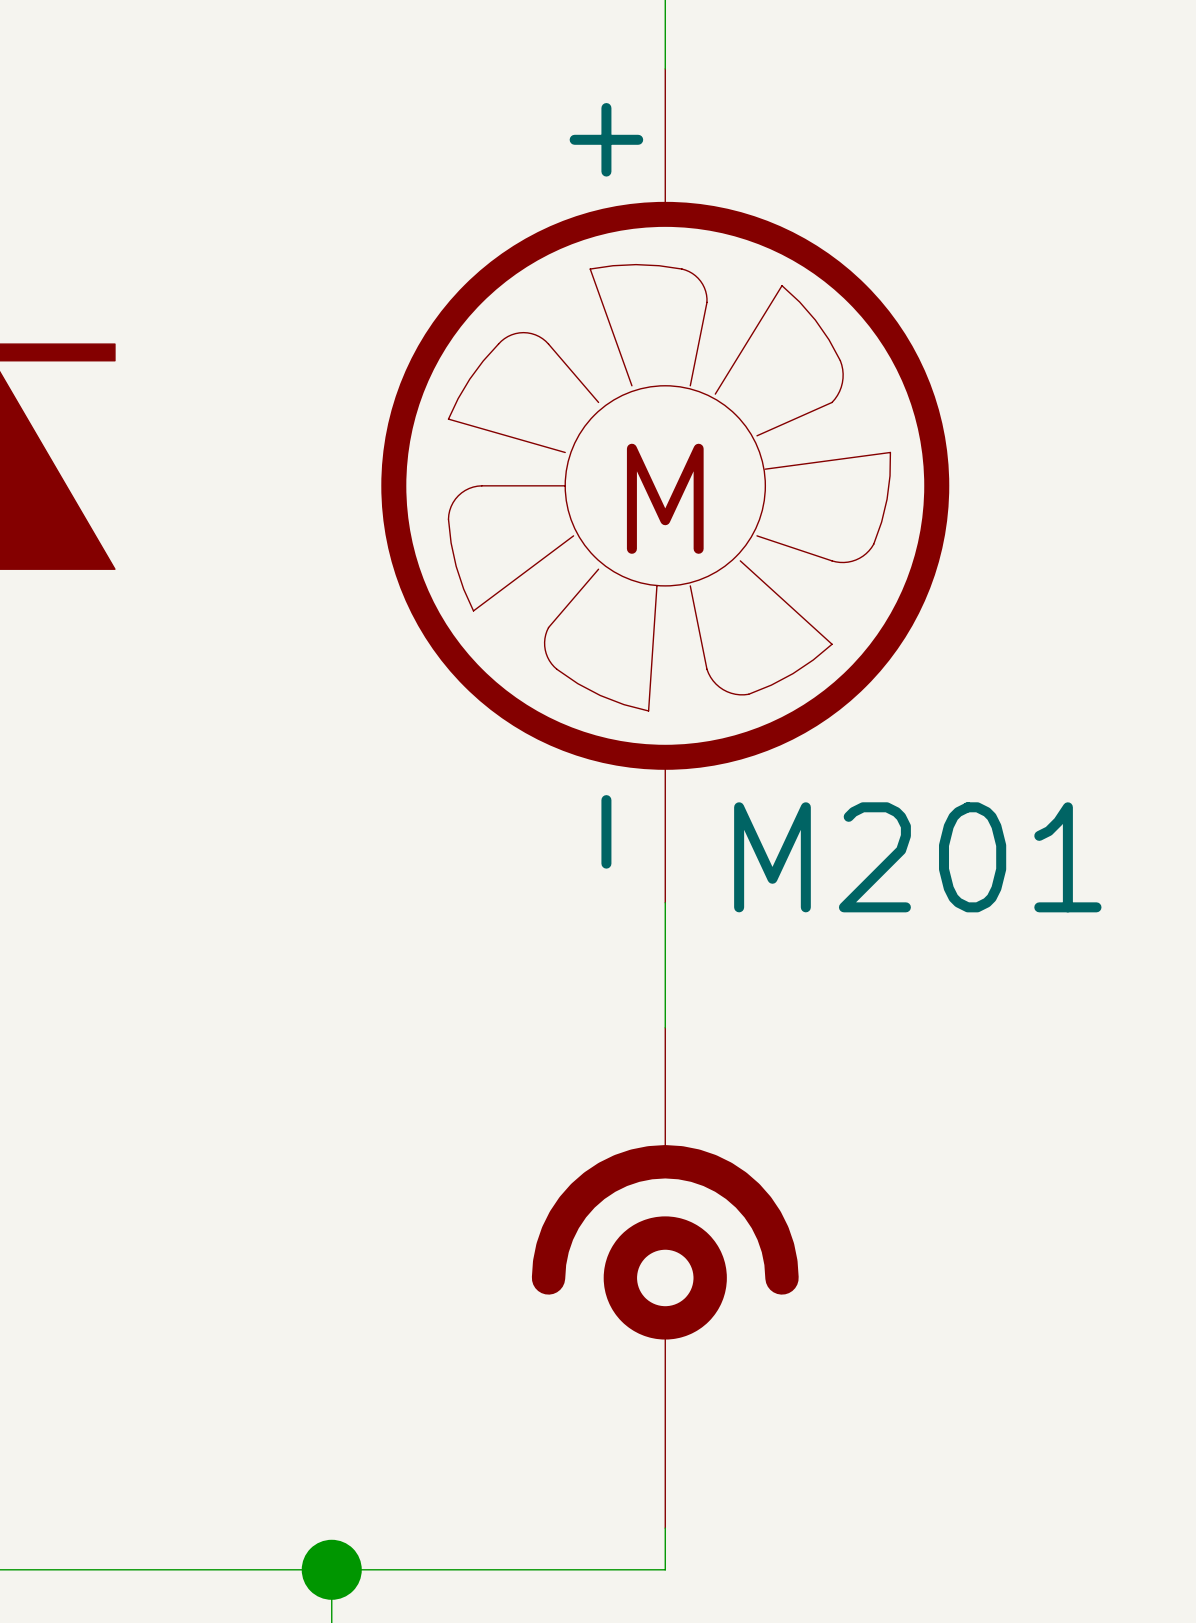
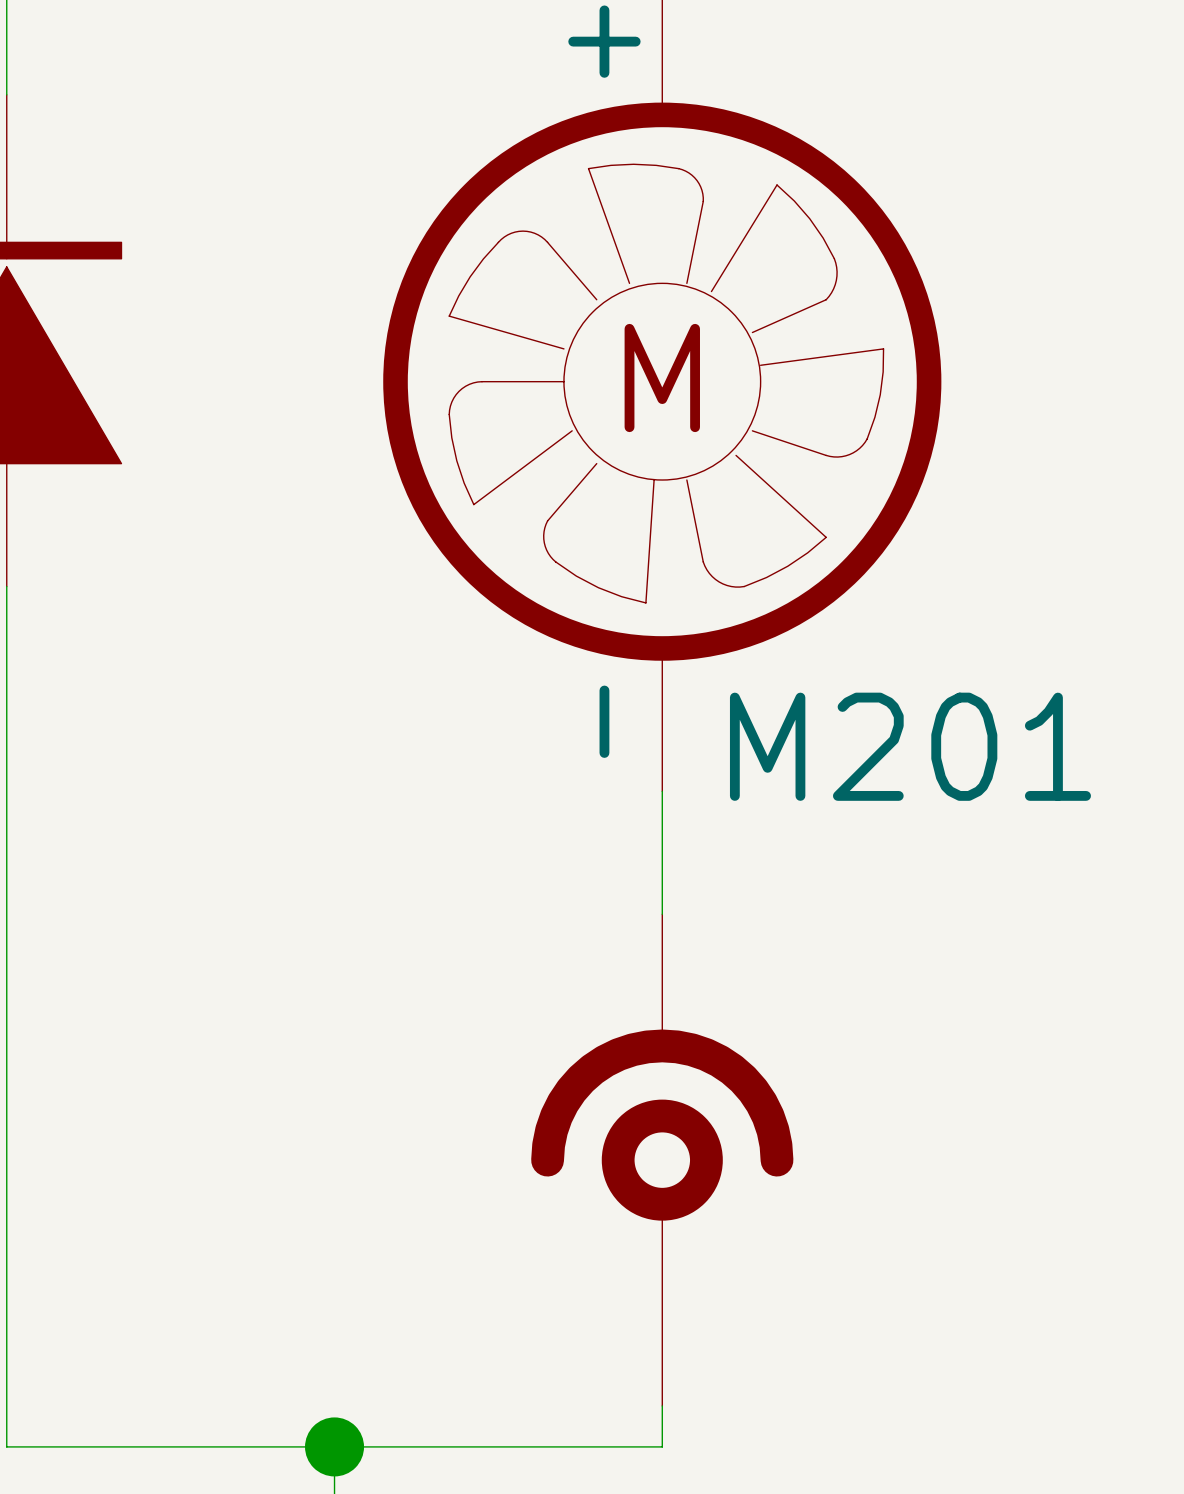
M201 text position: M (665, 498) -> M (662, 378)

